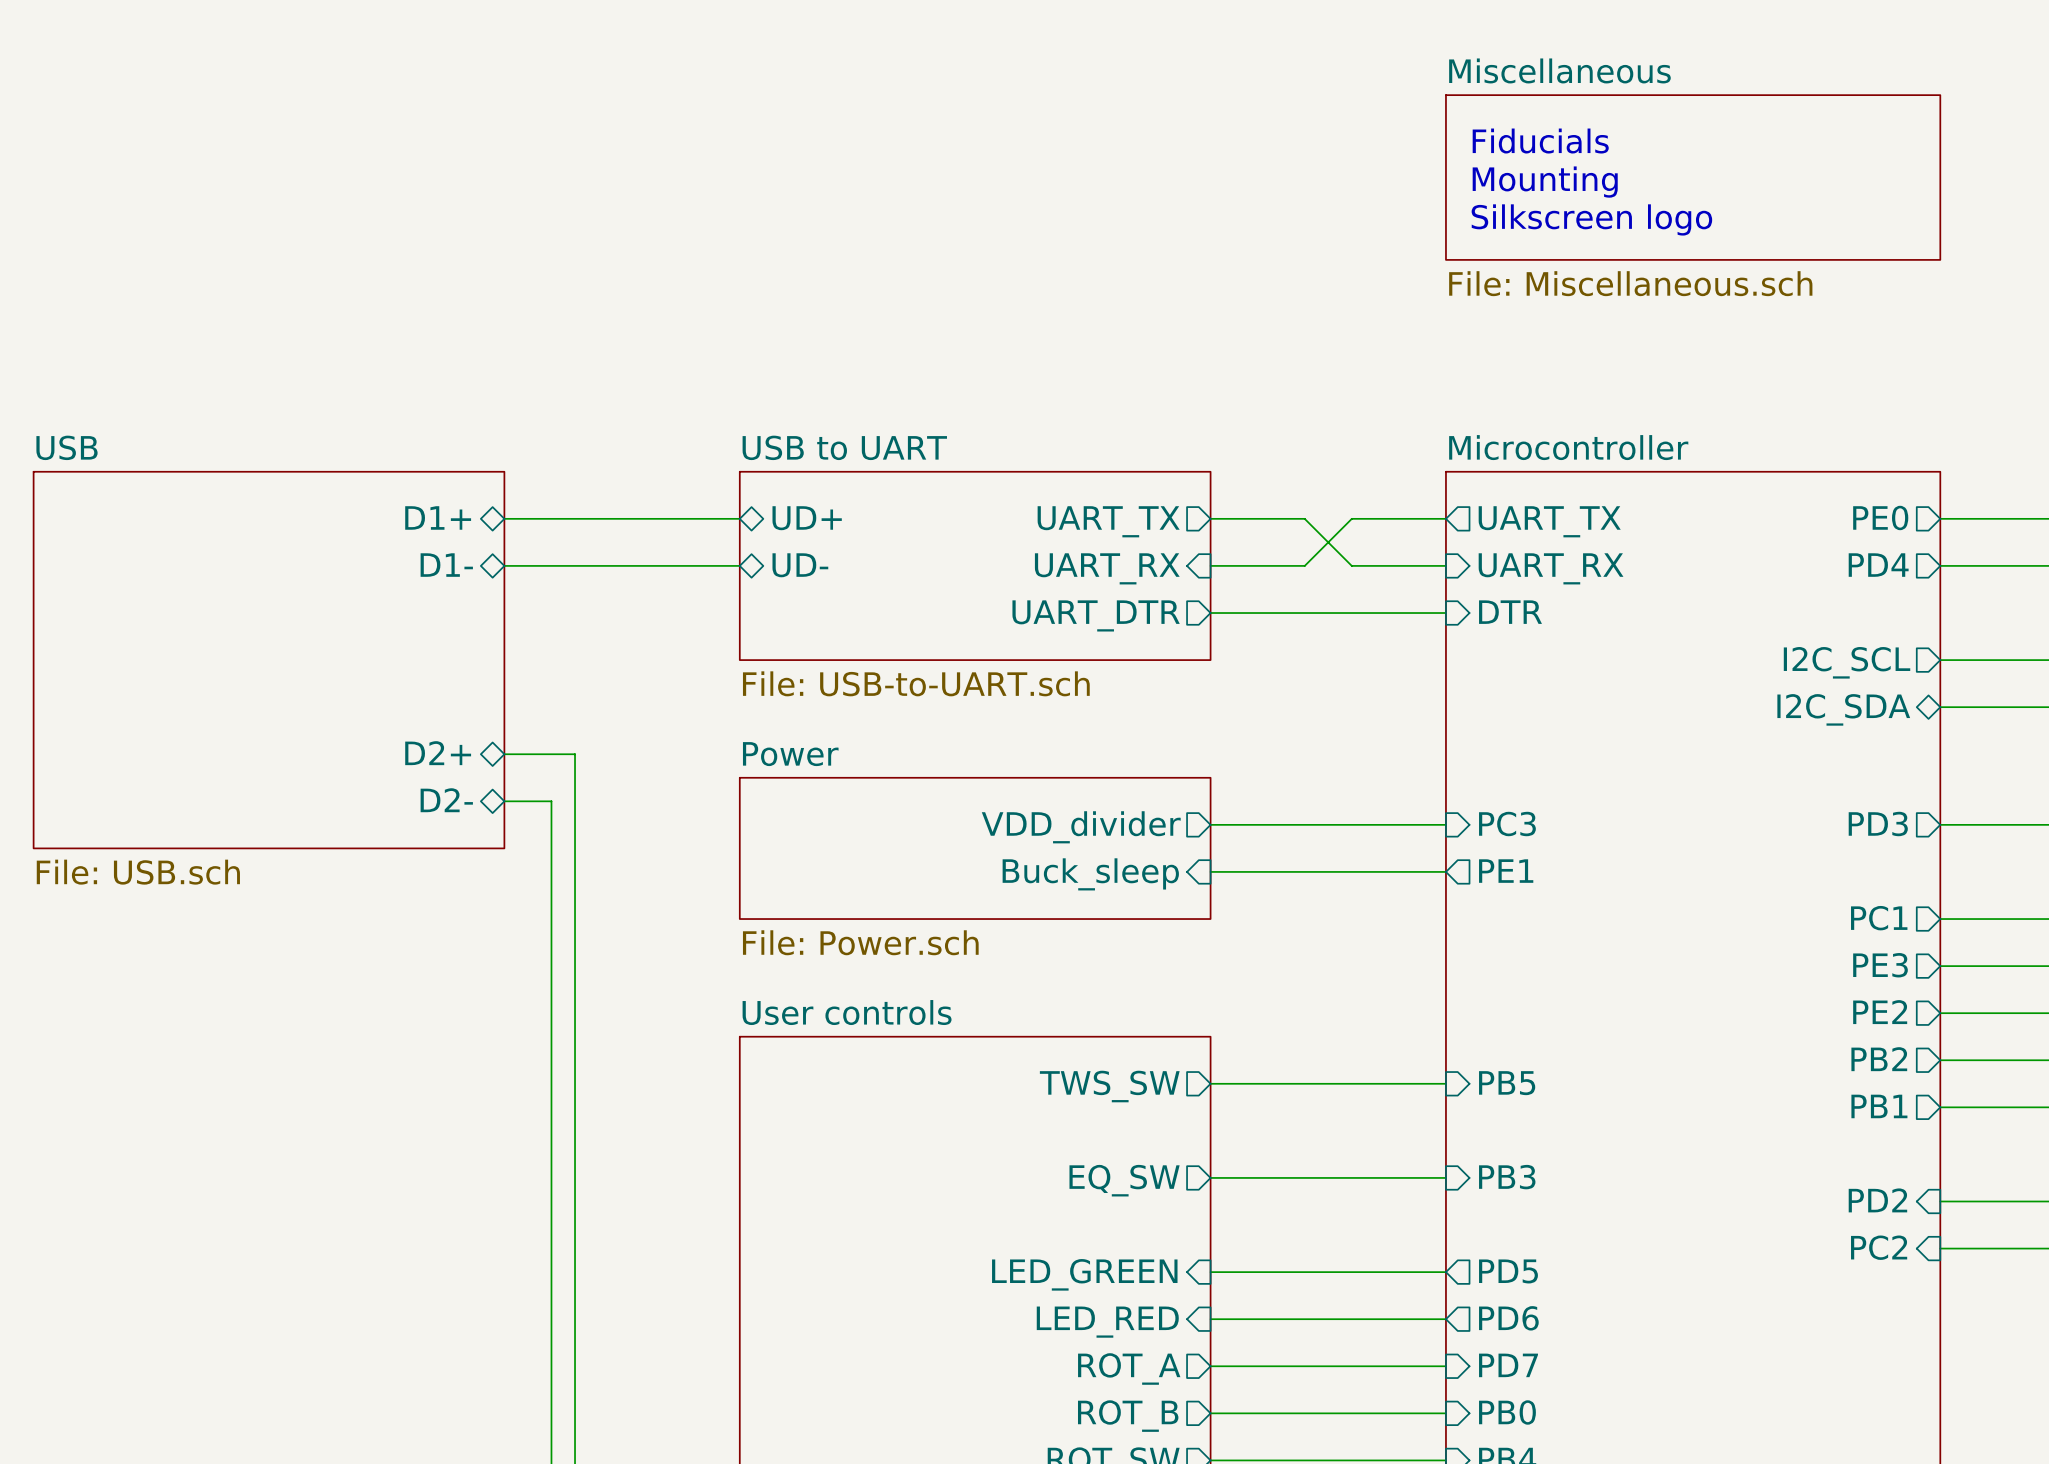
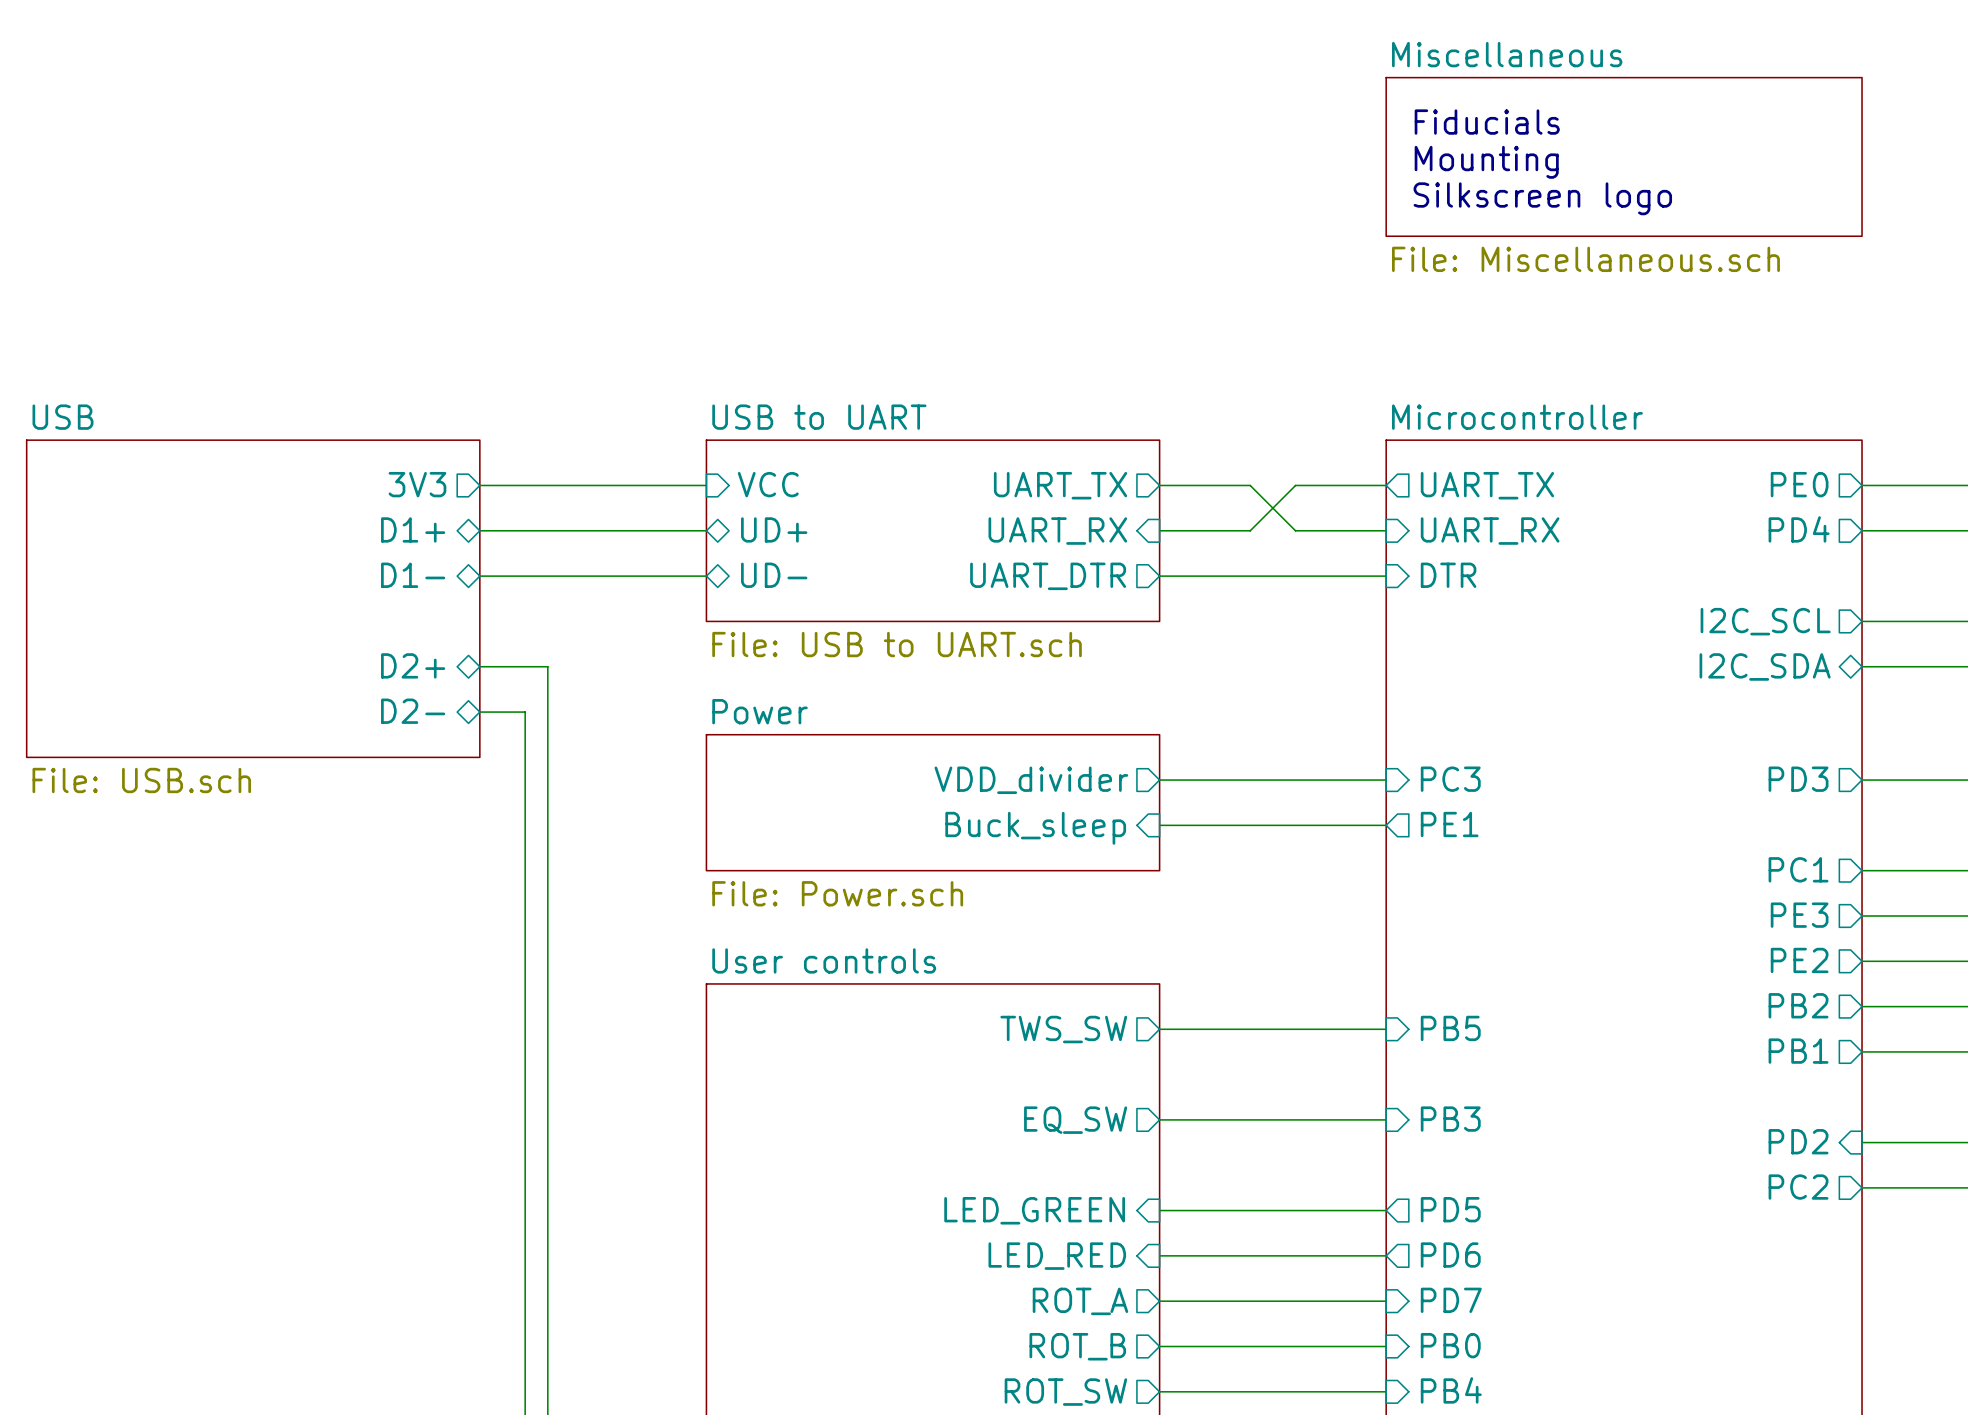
sheet pin shape: bidirectional (438, 517) -> output (417, 484)
sheet pin: D1+ (438, 517) -> 3V3 (417, 484)
sheet pin shape: bidirectional (807, 518) -> input (768, 484)
sheet pin: UD+ (807, 518) -> VCC (768, 484)
sheet pin: D1- (446, 565) -> D1+ (413, 529)
sheet pin: UD- (800, 565) -> UD+ (774, 529)
sheet pin: none -> D1- (413, 575)
sheet pin: none -> UD- (774, 575)
wire: none -> (479, 576) (706, 576)
sheet USB: none -> File: USB.sch (253, 598)
sheet USB: File: USB.sch (269, 660) -> none
sheet USB to UART value: File: USB-to-UART.sch (916, 683) -> File: USB to UART.sch (897, 644)
sheet pin: none -> D2+ (413, 665)
wire: none -> (479, 666) (547, 666) (547, 712)
sheet pin: D2+ (438, 753) -> D2- (413, 711)
wire: (551, 754) (575, 754) -> (525, 712) (525, 757)
sheet pin: D2- (446, 800) -> none
wire: (504, 801) (551, 801) -> none
sheet pin shape: input (1879, 1247) -> output (1798, 1187)

